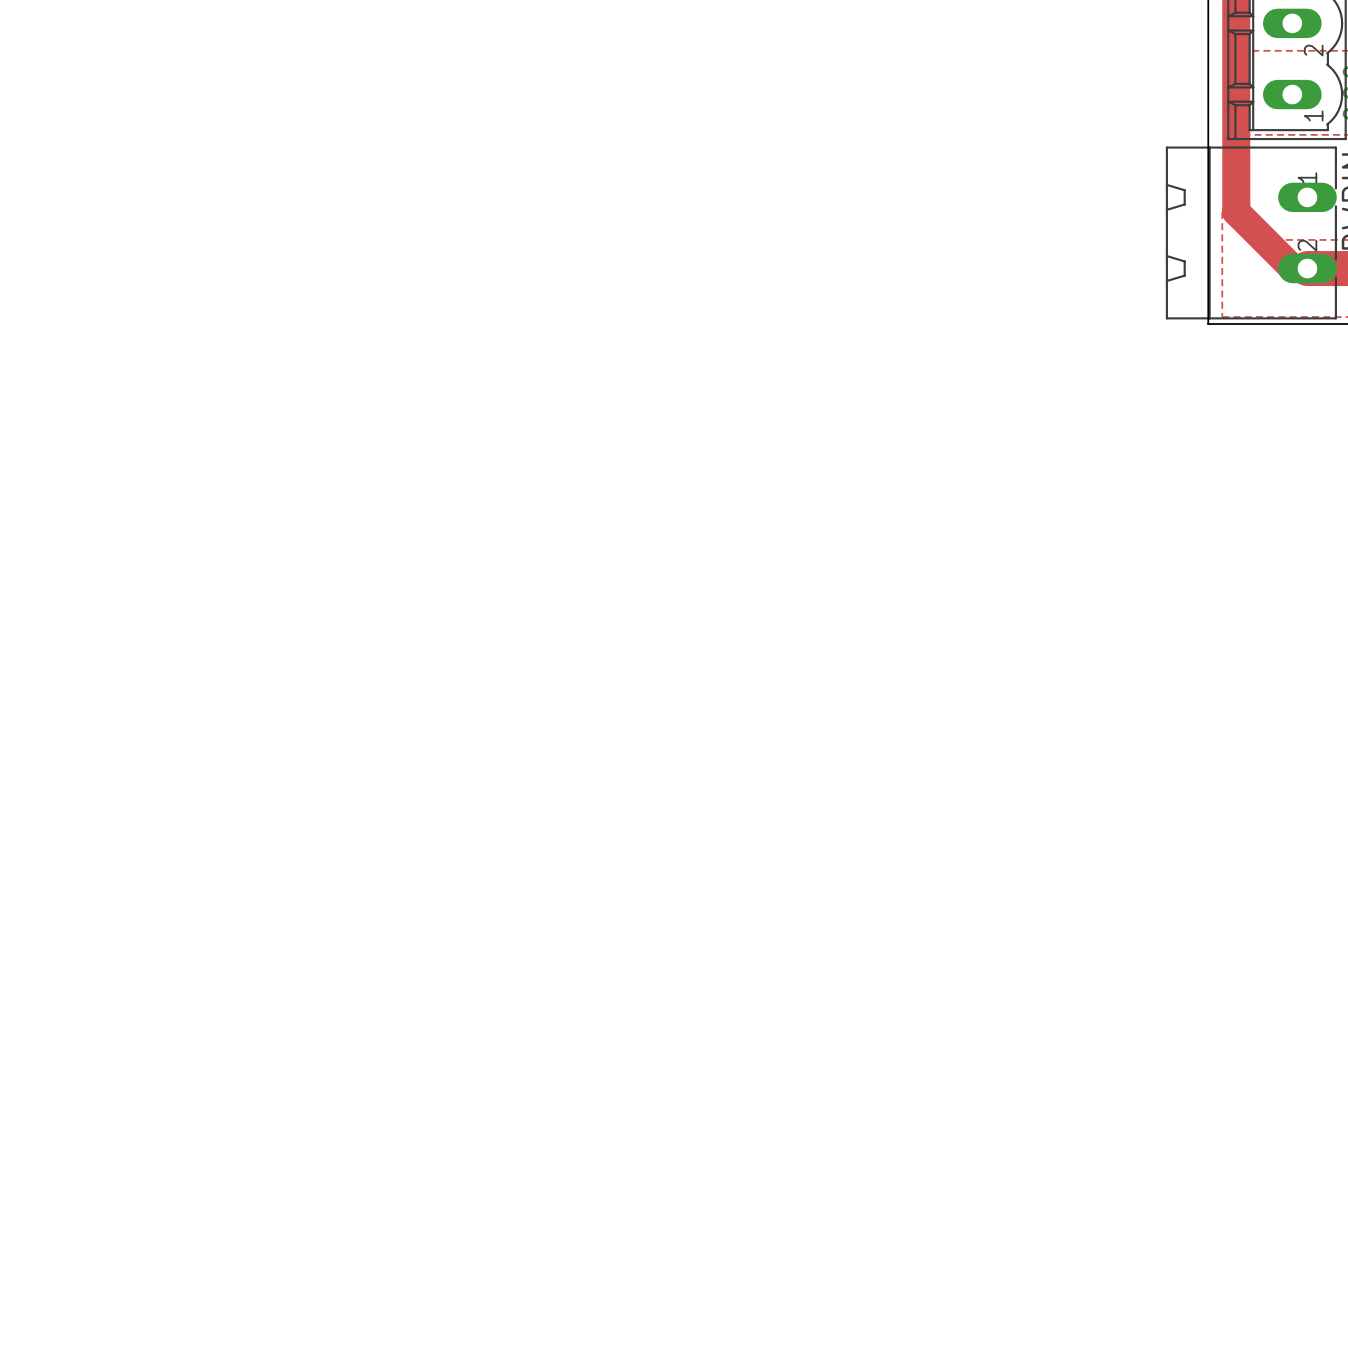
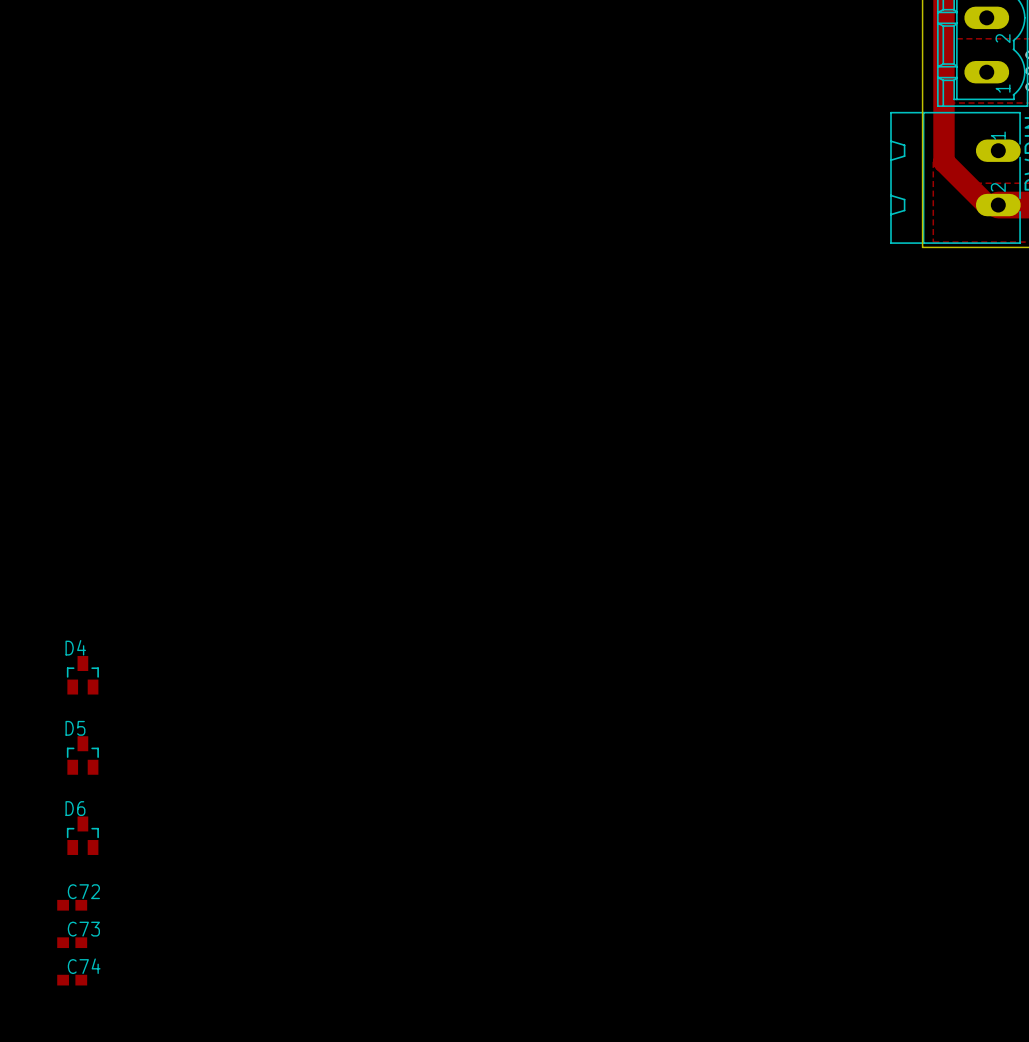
D4: none -> (82, 675)
D5: none -> (82, 755)
D6: none -> (82, 835)
C72: none -> (72, 905)
C73: none -> (72, 942)
C74: none -> (72, 980)

